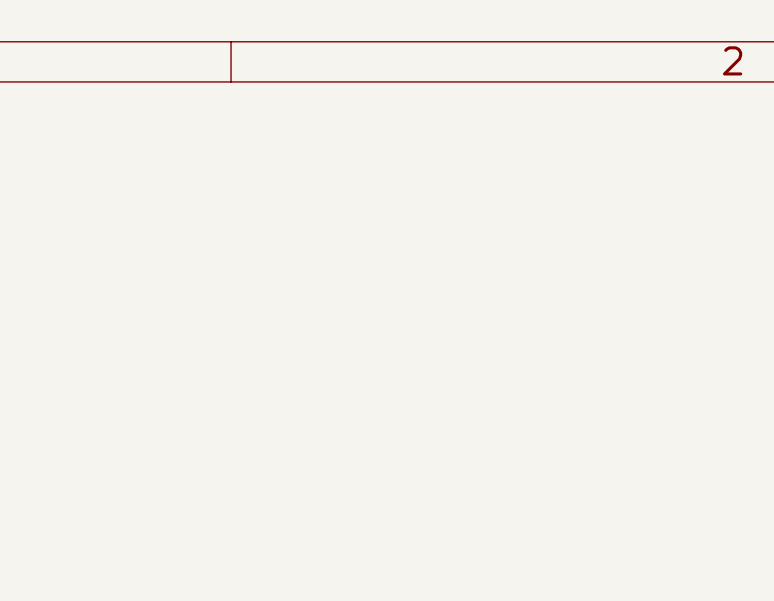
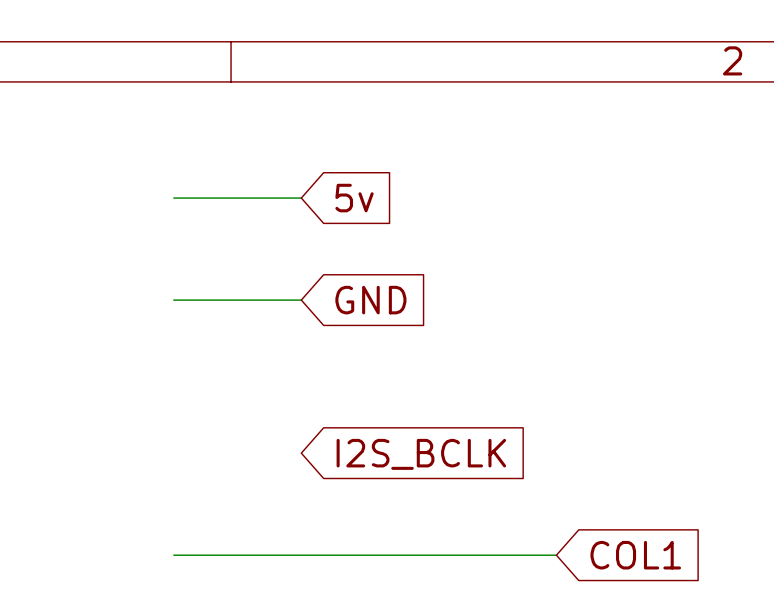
wire: none -> (173, 198) (301, 198)
global label: none -> 5v (354, 198)
wire: none -> (173, 300) (301, 300)
global label: none -> GND (370, 300)
global label: none -> I2S_BCLK (421, 454)
wire: none -> (173, 555) (556, 555)
global label: none -> COL1 (635, 555)

